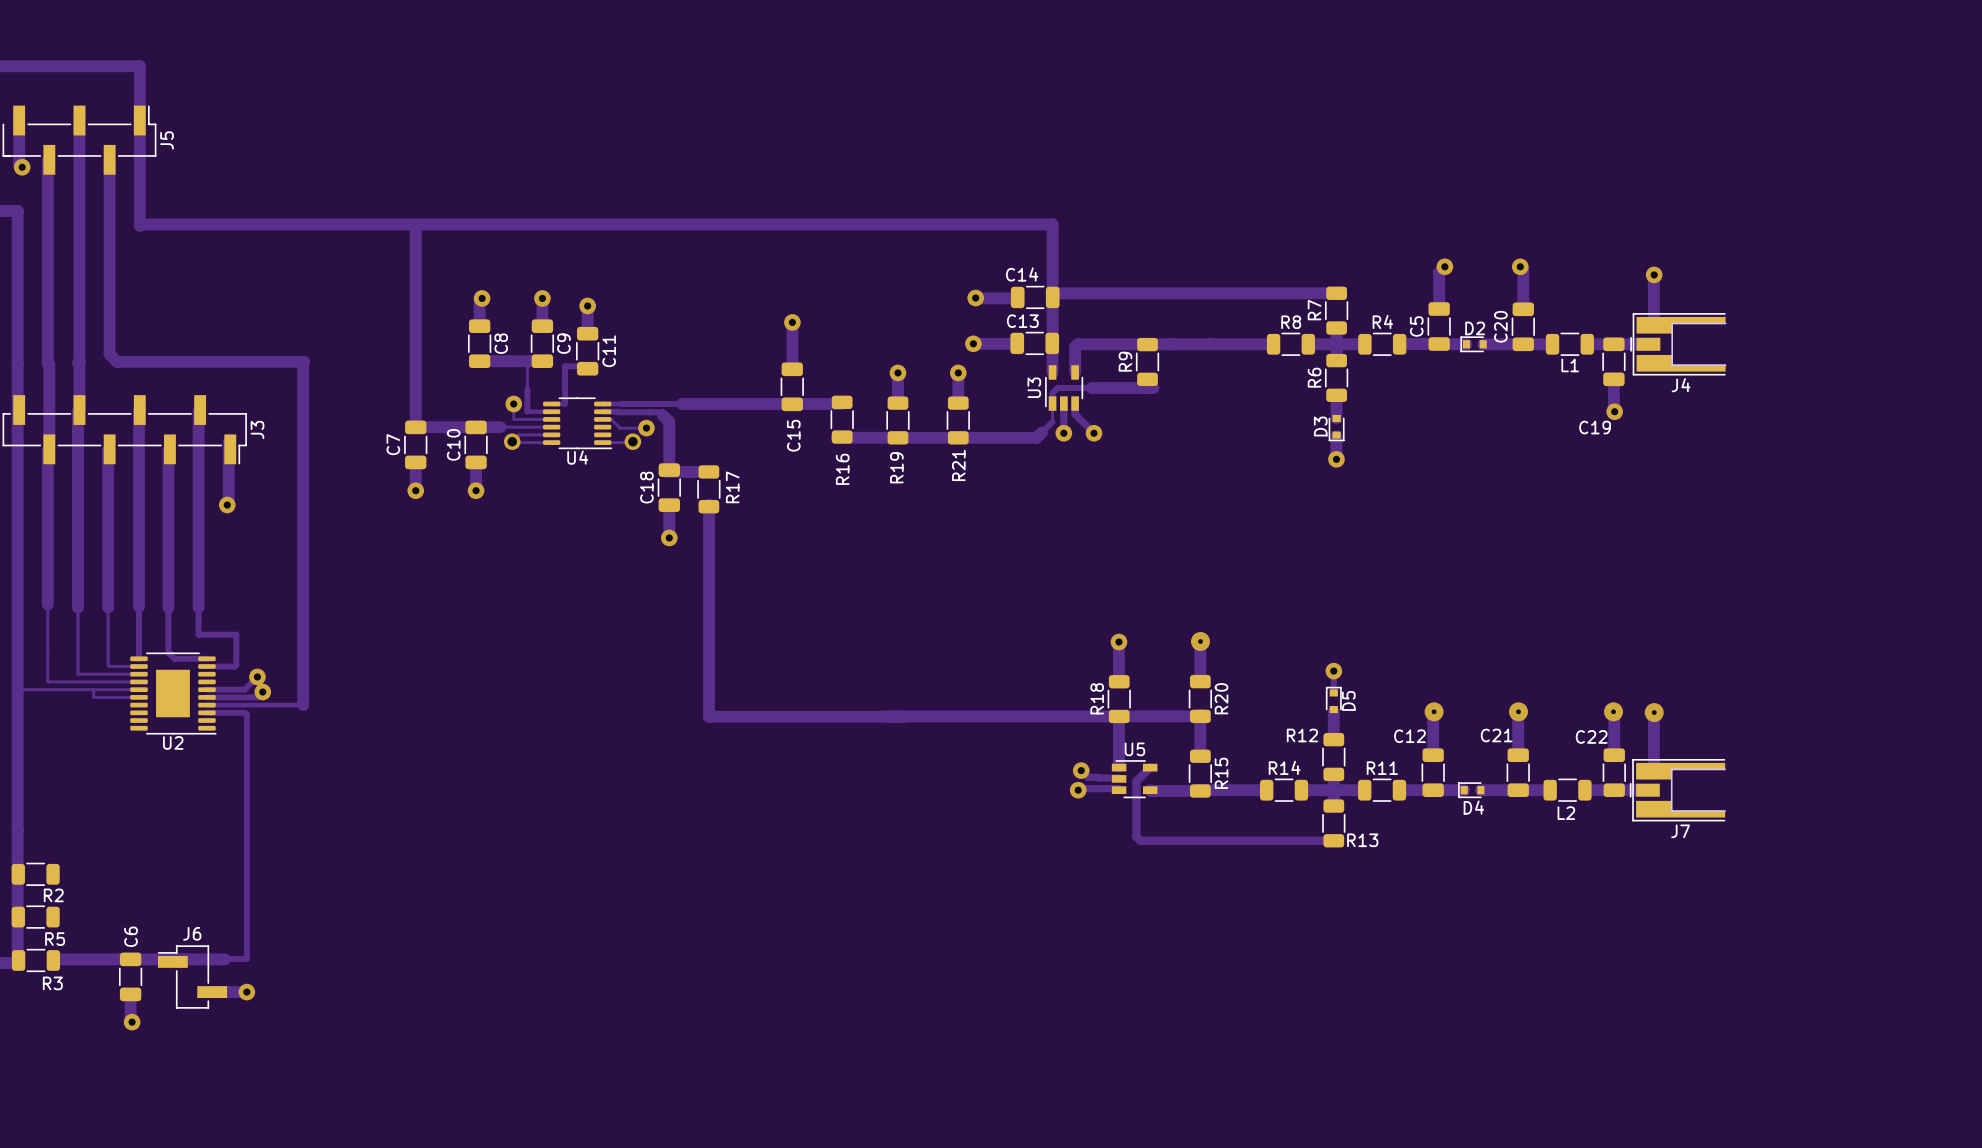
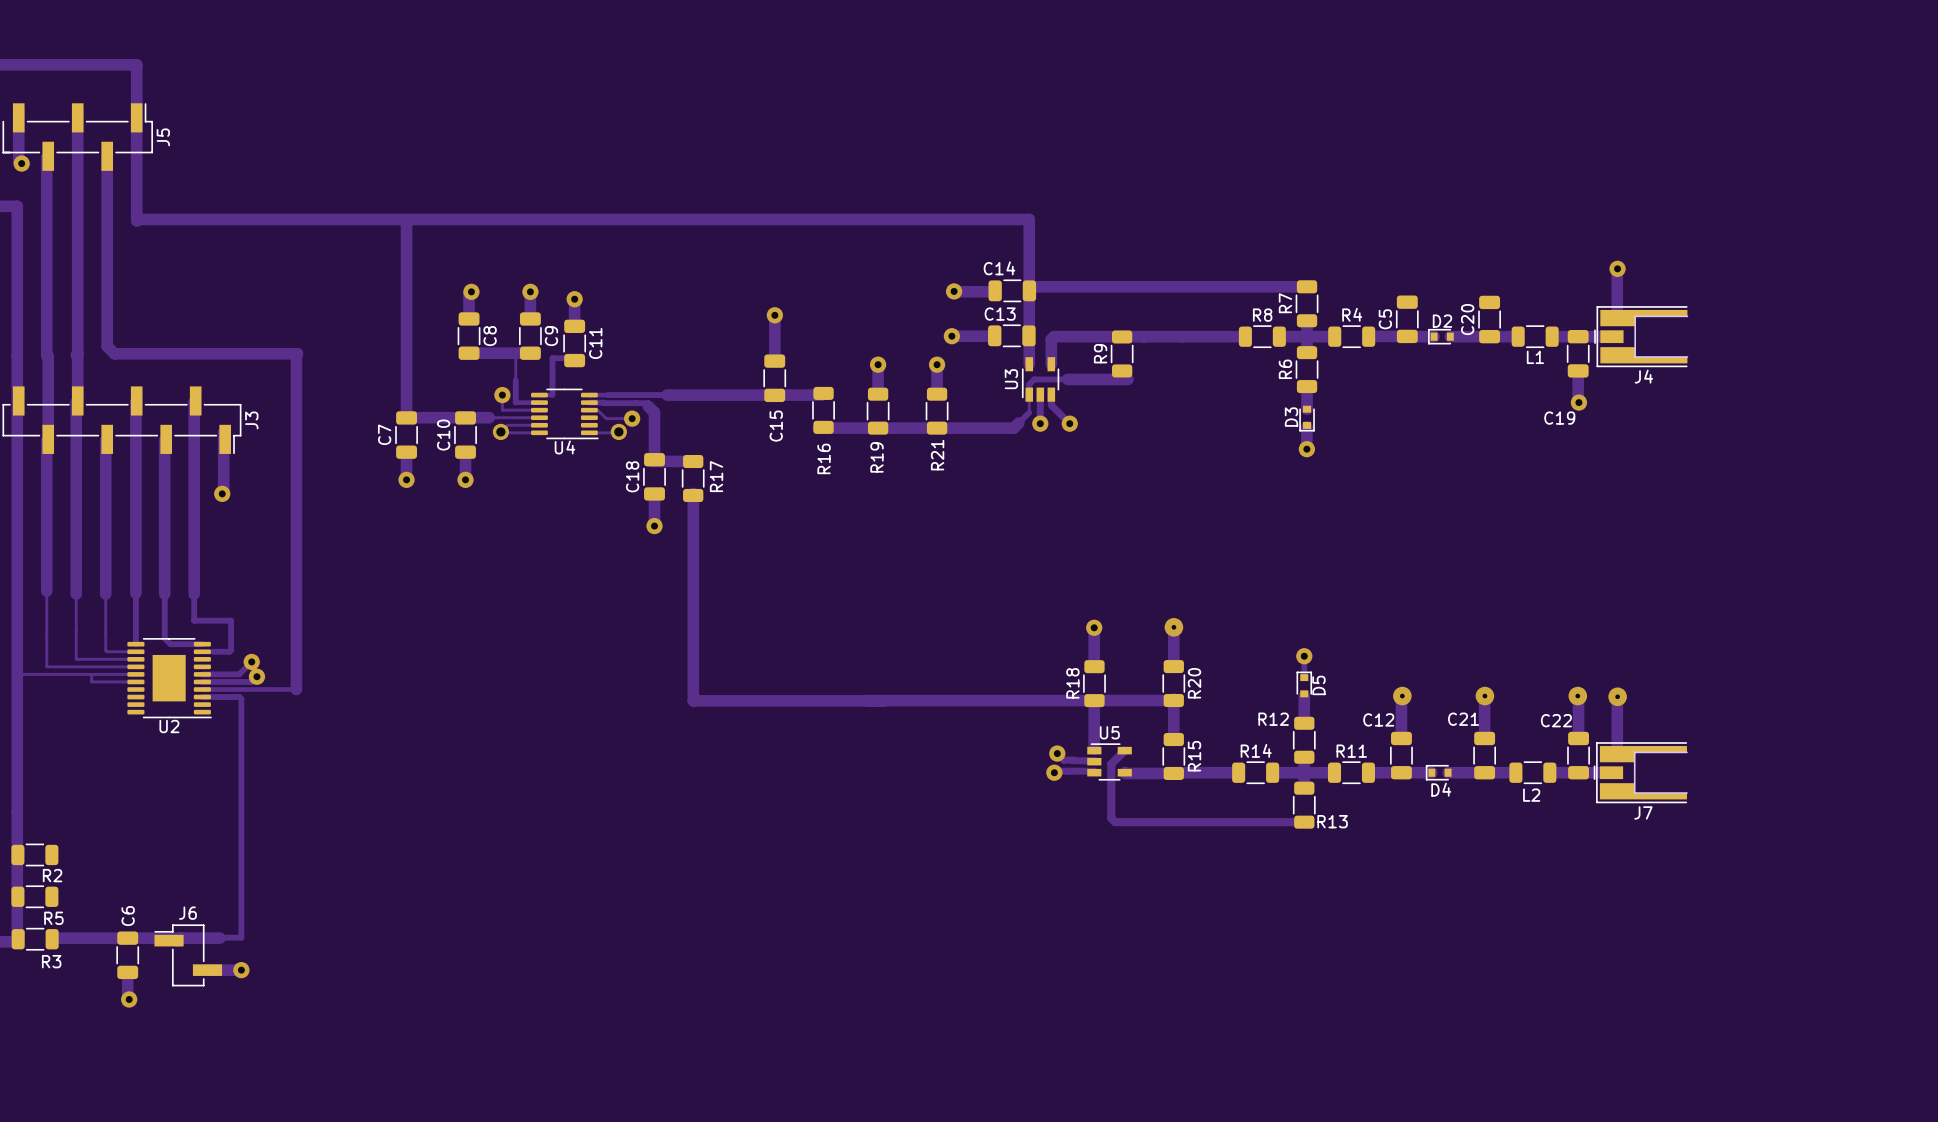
track: (1444, 266) (1439, 272) (1439, 309) -> none
via: (1444, 266) -> none
track: (1520, 266) (1523, 269) (1523, 309) -> none
via: (1520, 266) -> none

